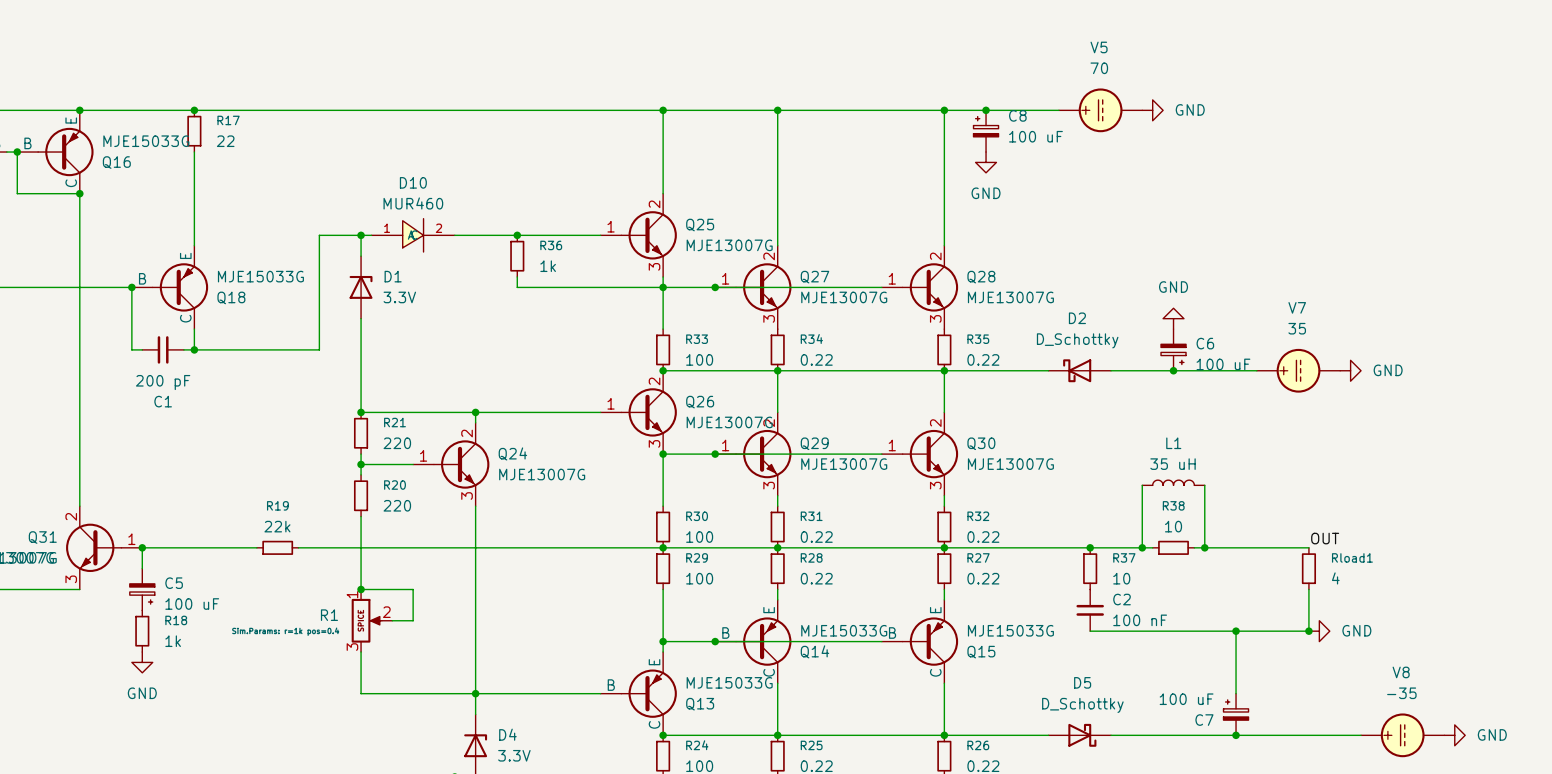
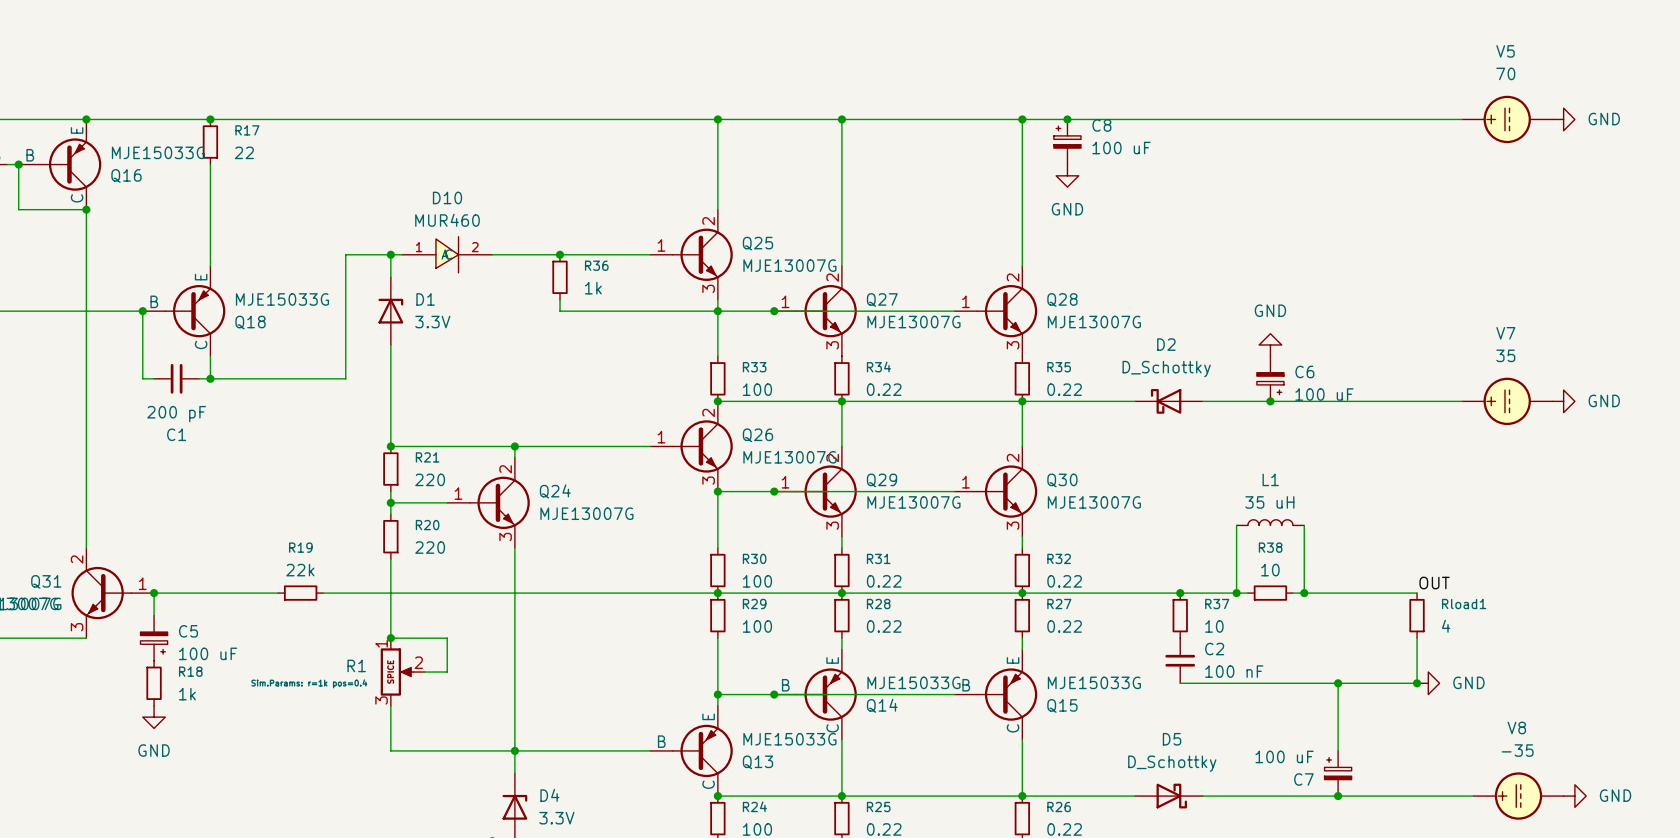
wire: none -> (1146, 119) (1462, 119)
V5 position: (1100, 110) -> (1507, 119)
power symbol: GND (1152, 110) -> none
power symbol: none -> GND (1563, 119)
V7 position: (1298, 370) -> (1507, 401)
power symbol position: GND (1350, 370) -> GND (1563, 401)

